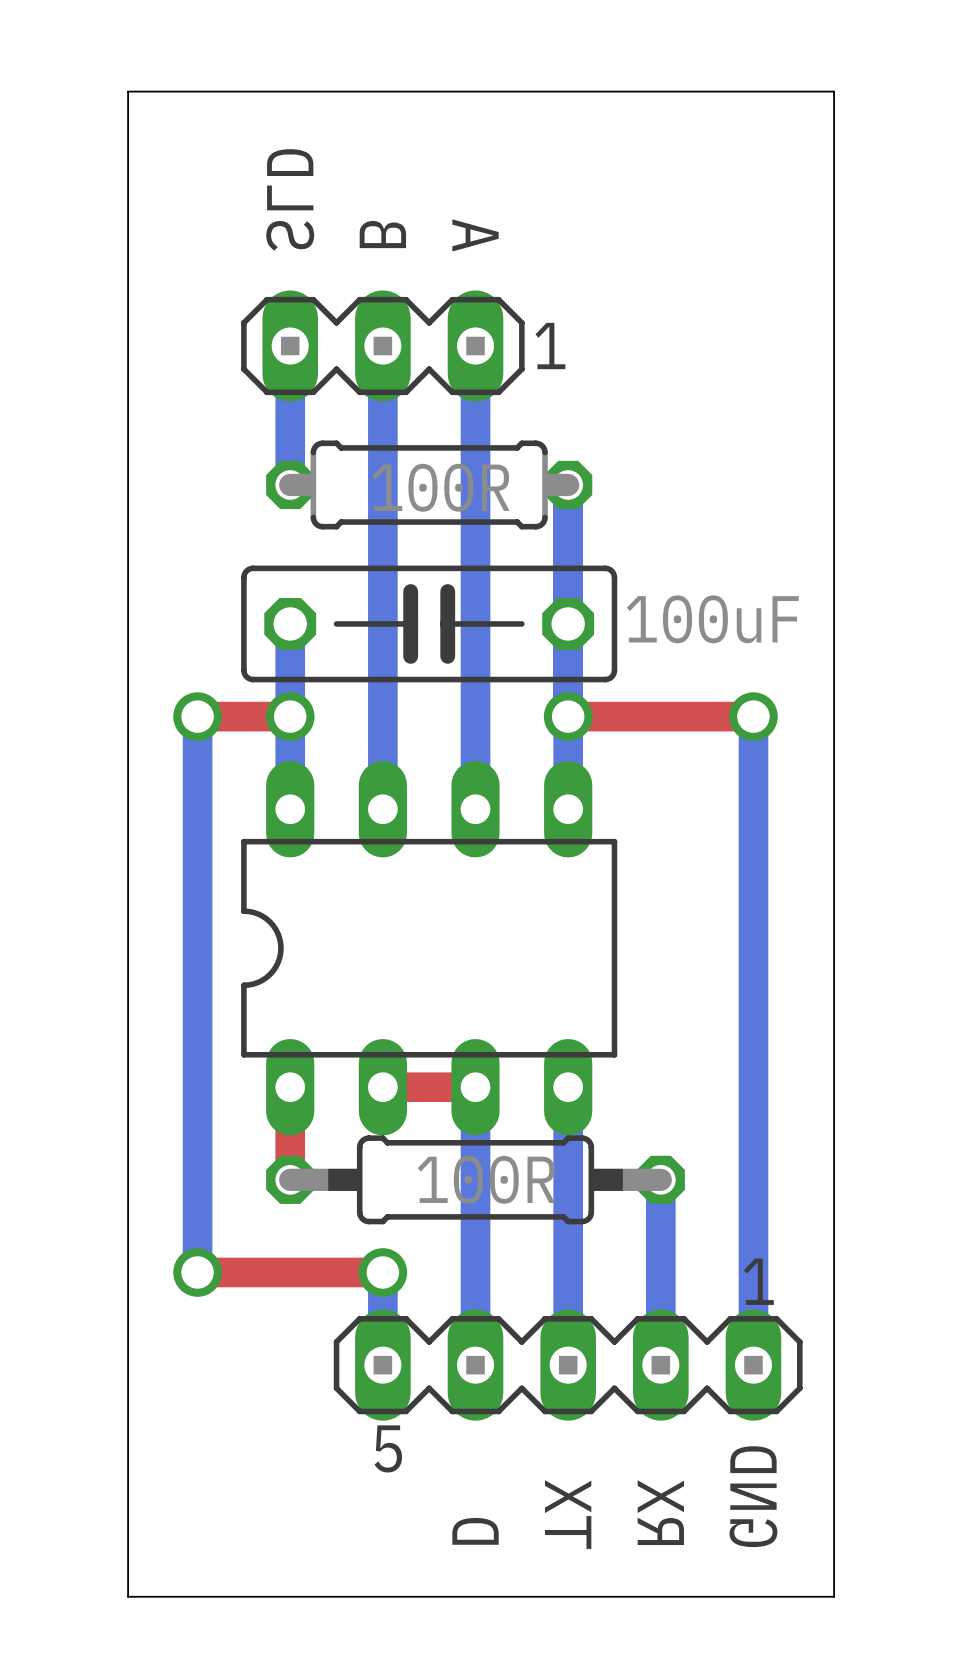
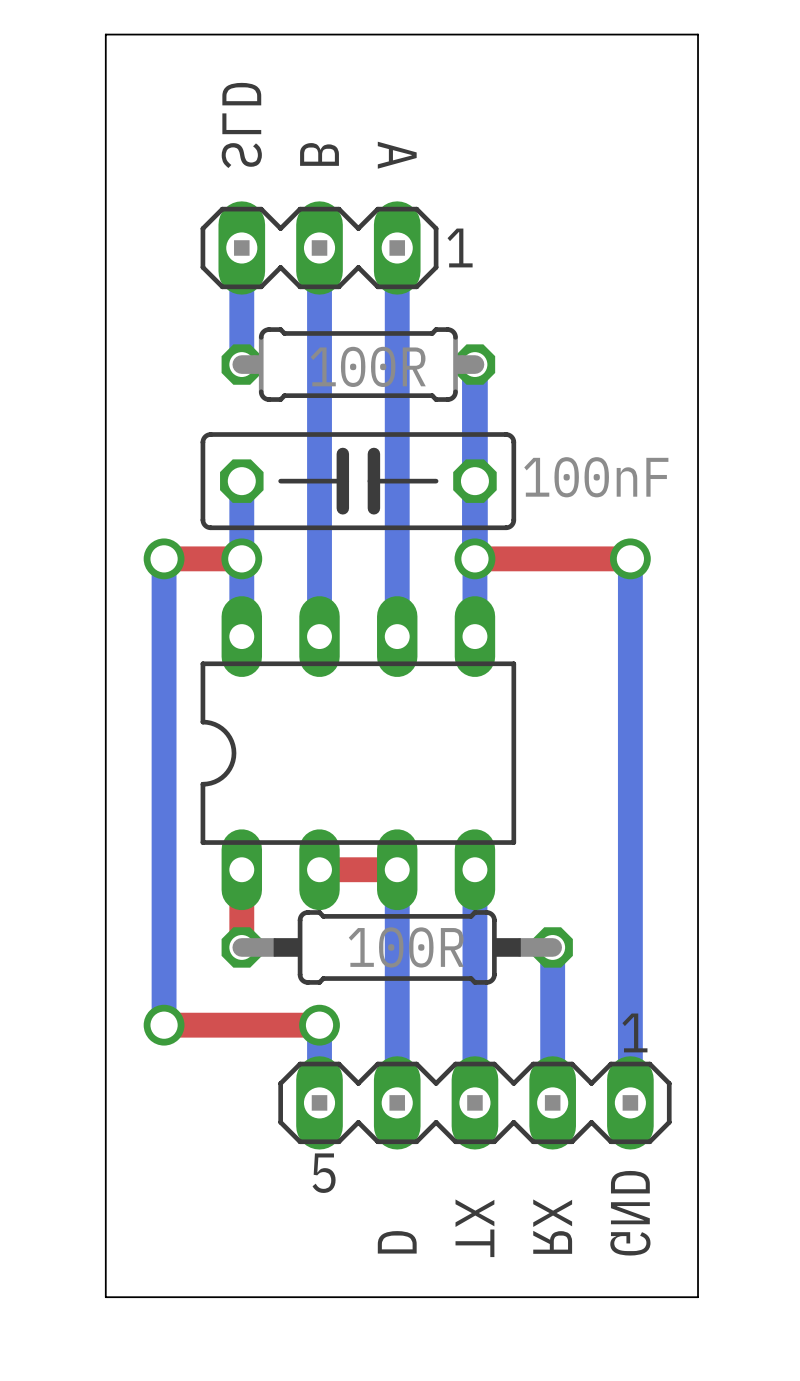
part value: 100uF (712, 619) -> 100nF (596, 477)

